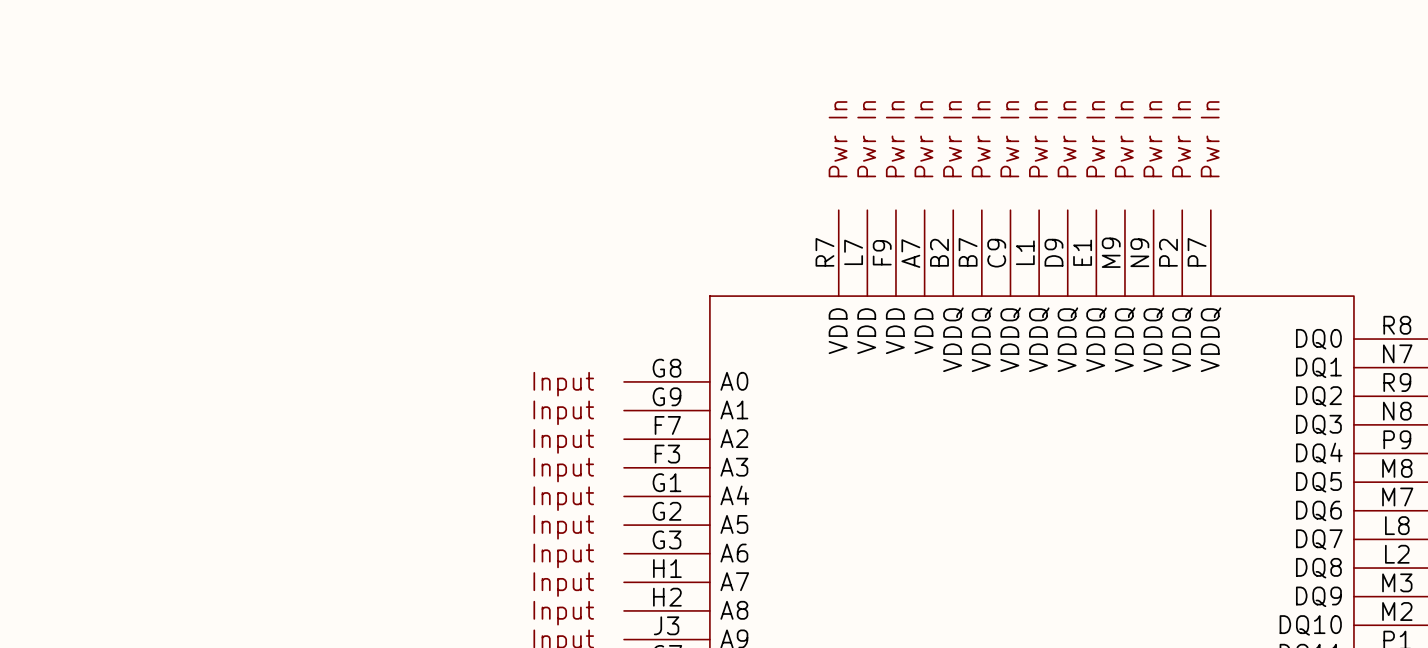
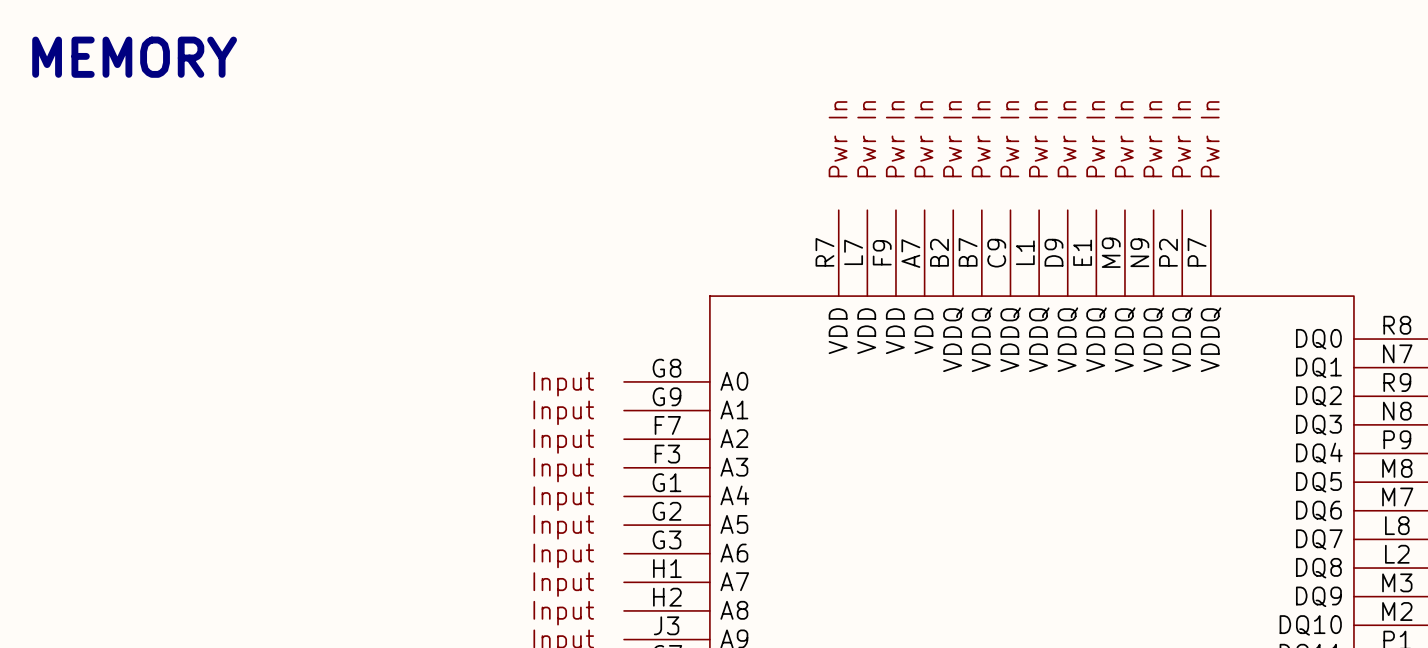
text: none -> MEMORY (134, 57)

